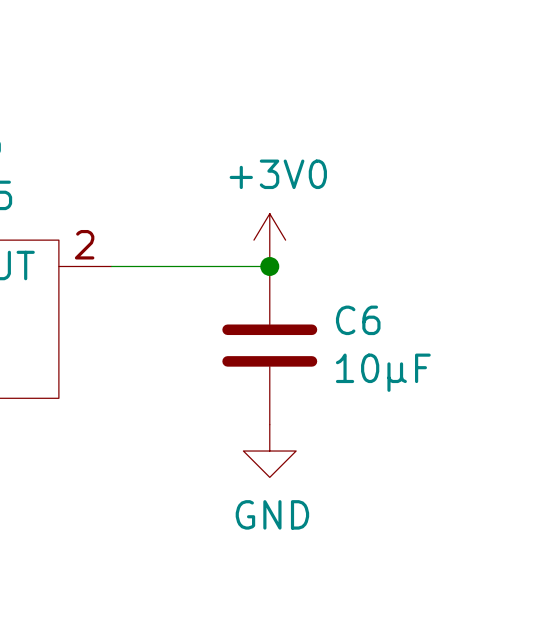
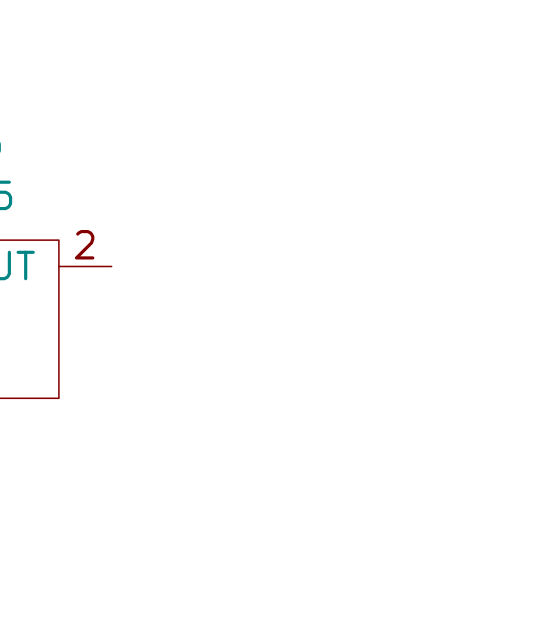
power symbol: +3V0 (269, 240) -> none
wire: (111, 266) (269, 266) -> none
junction: (269, 266) -> none
C6: 10µF (269, 345) -> none
power symbol: GND (269, 451) -> none

